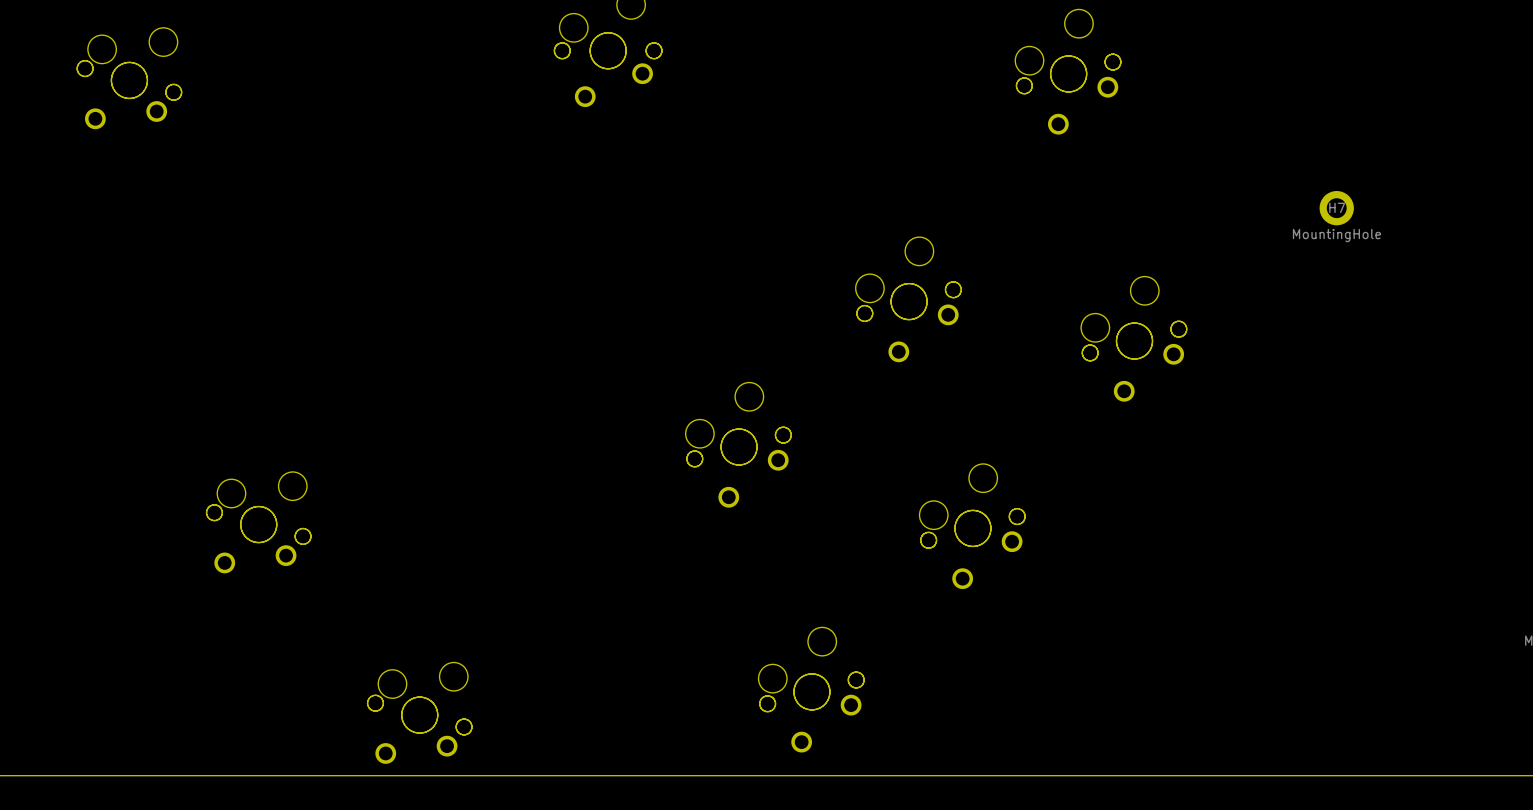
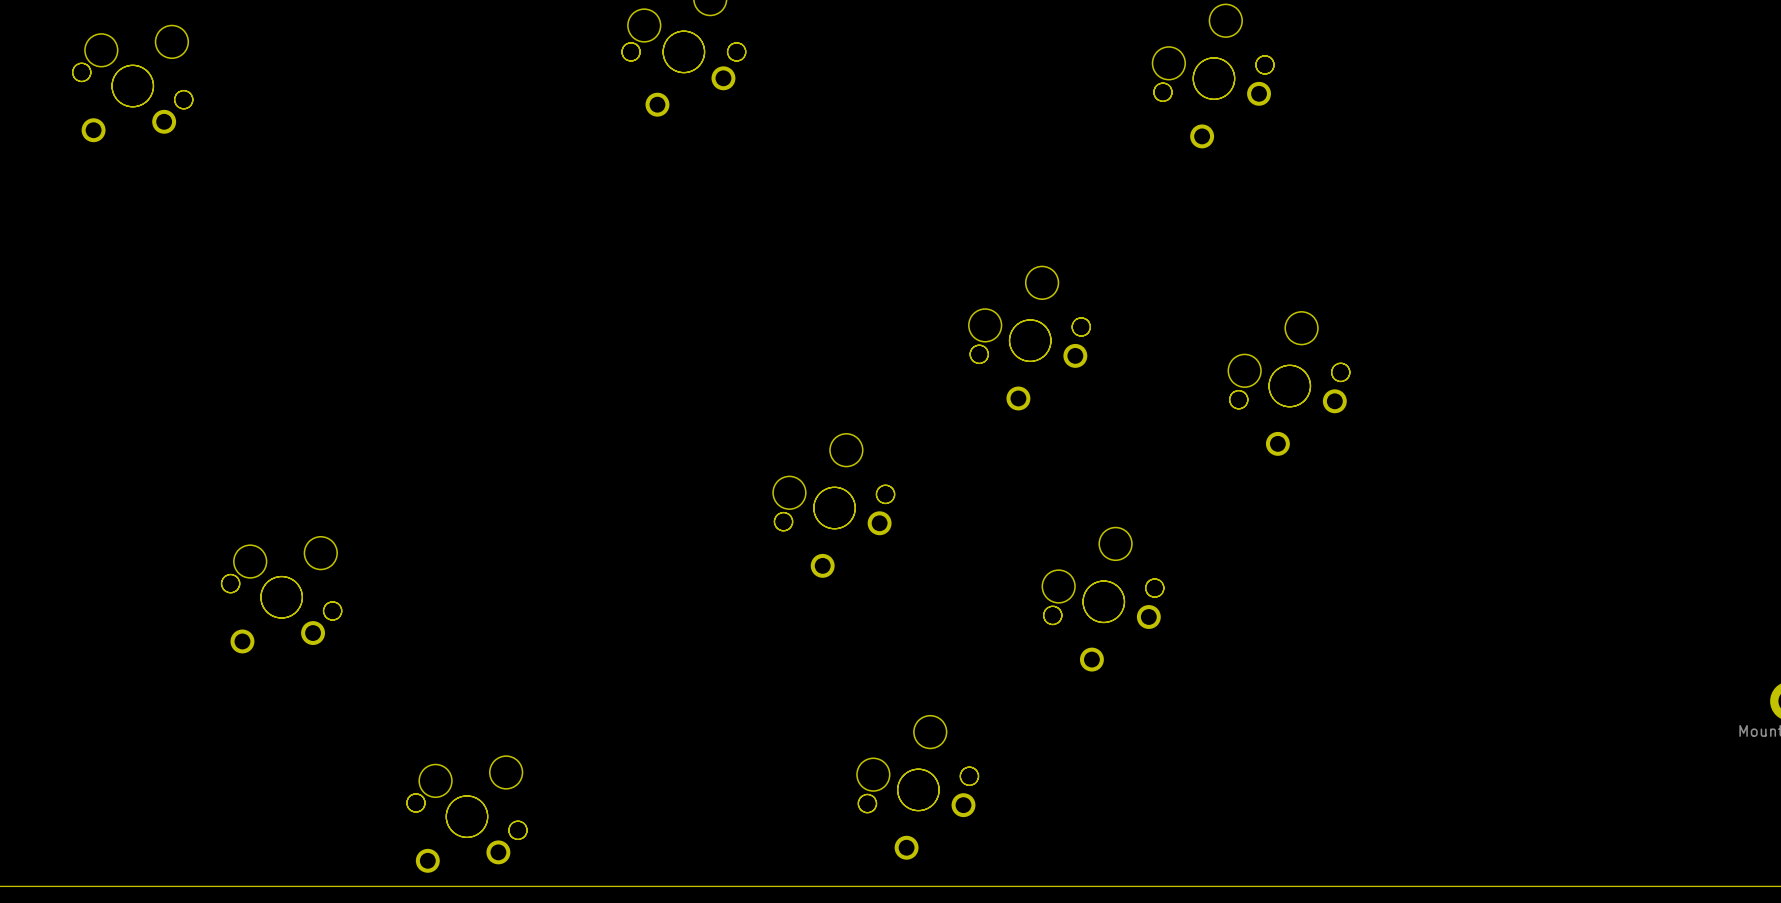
H7: MountingHole (1336, 208) -> none

